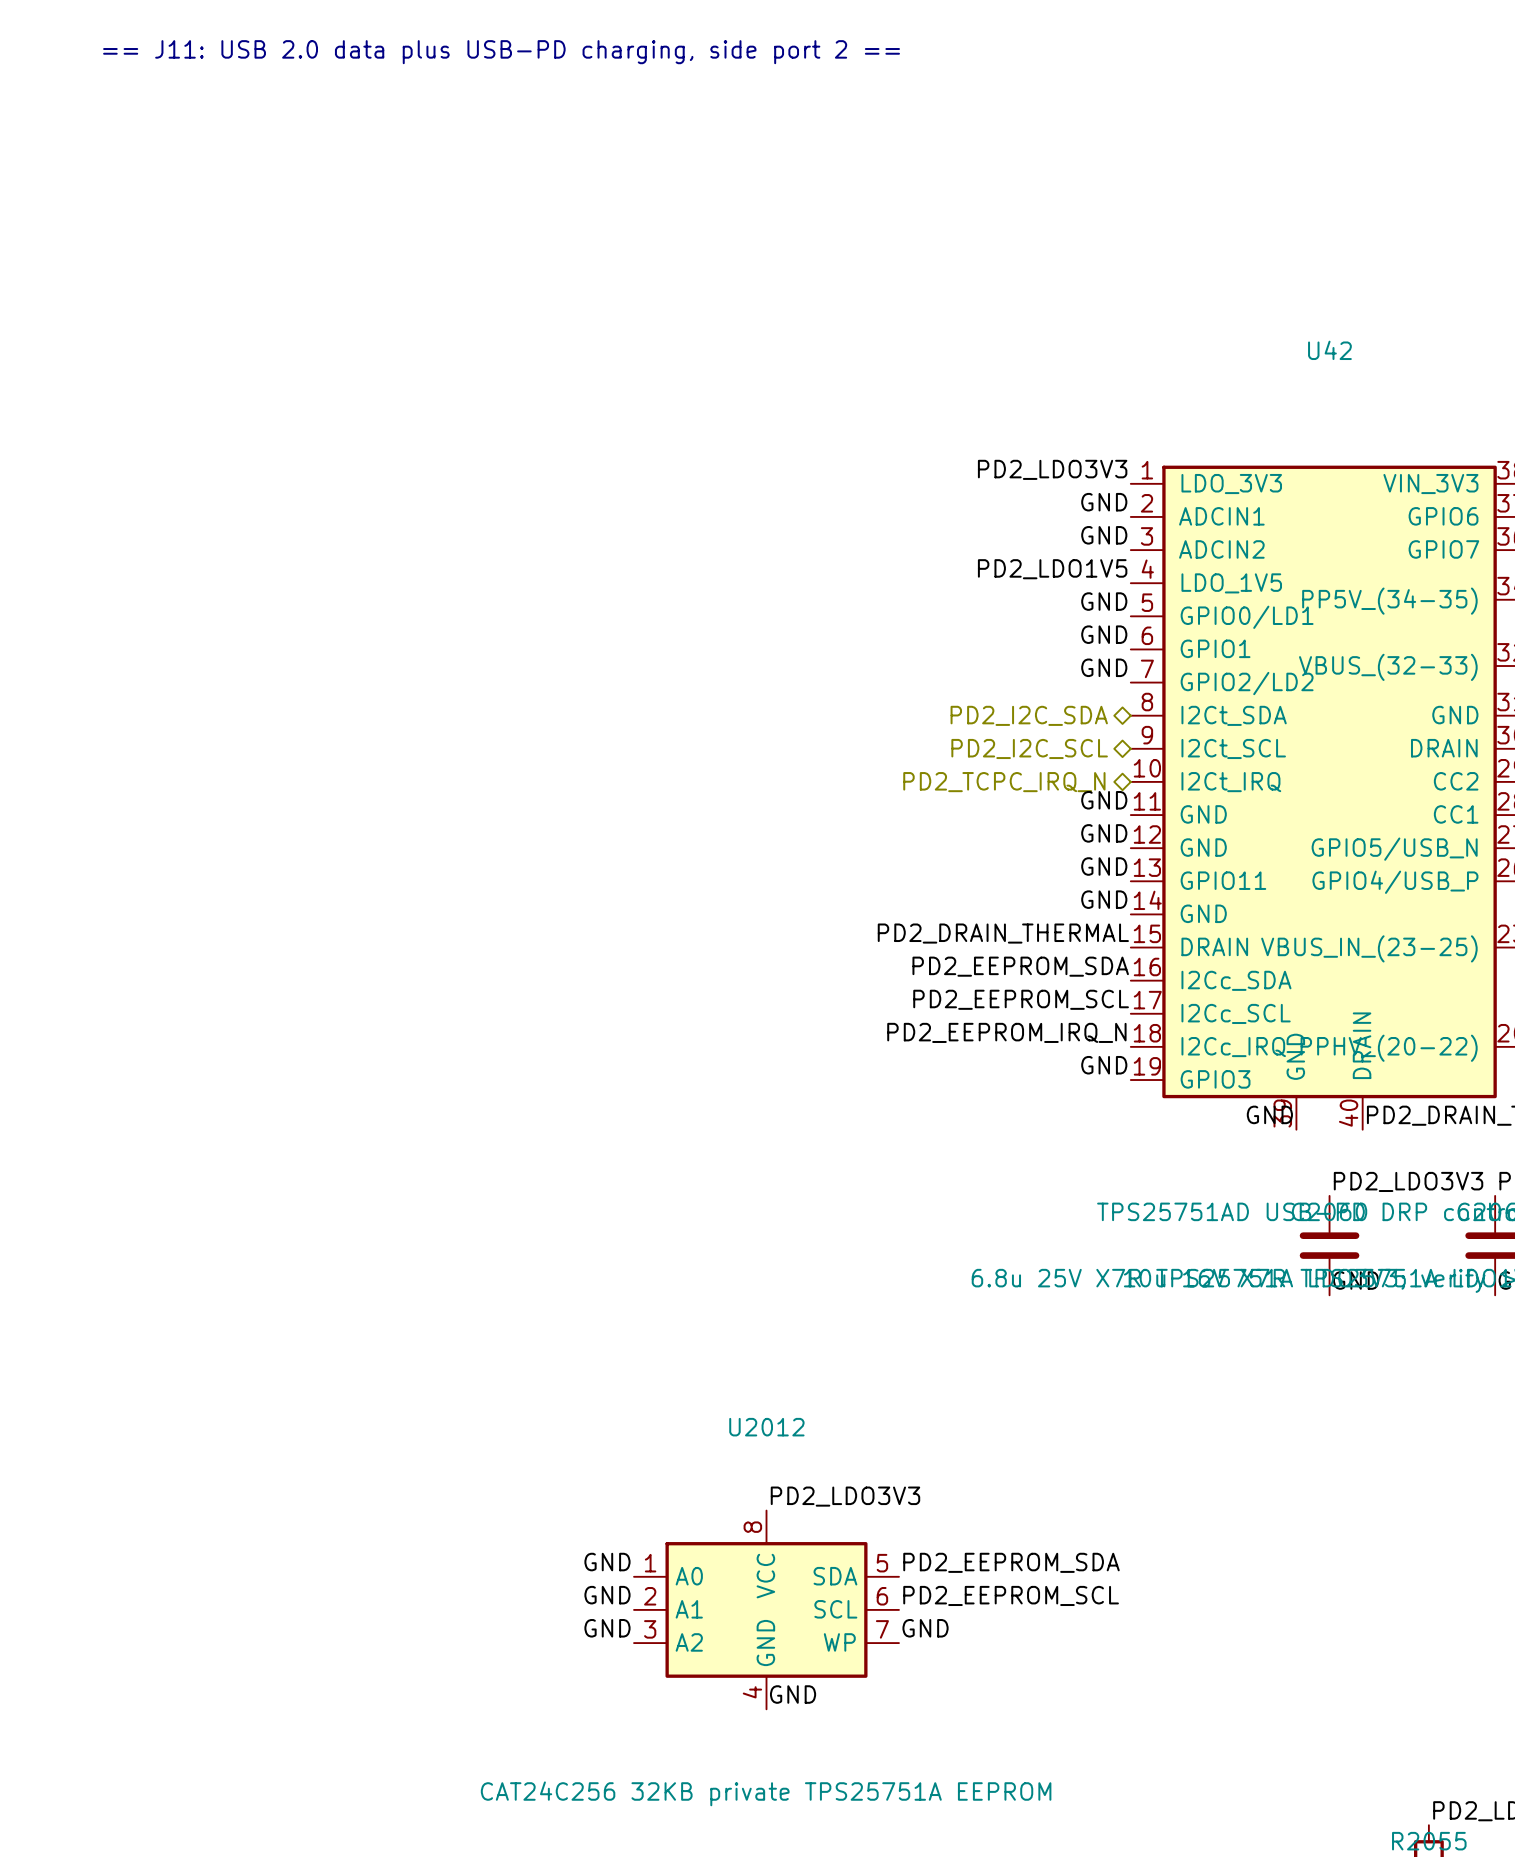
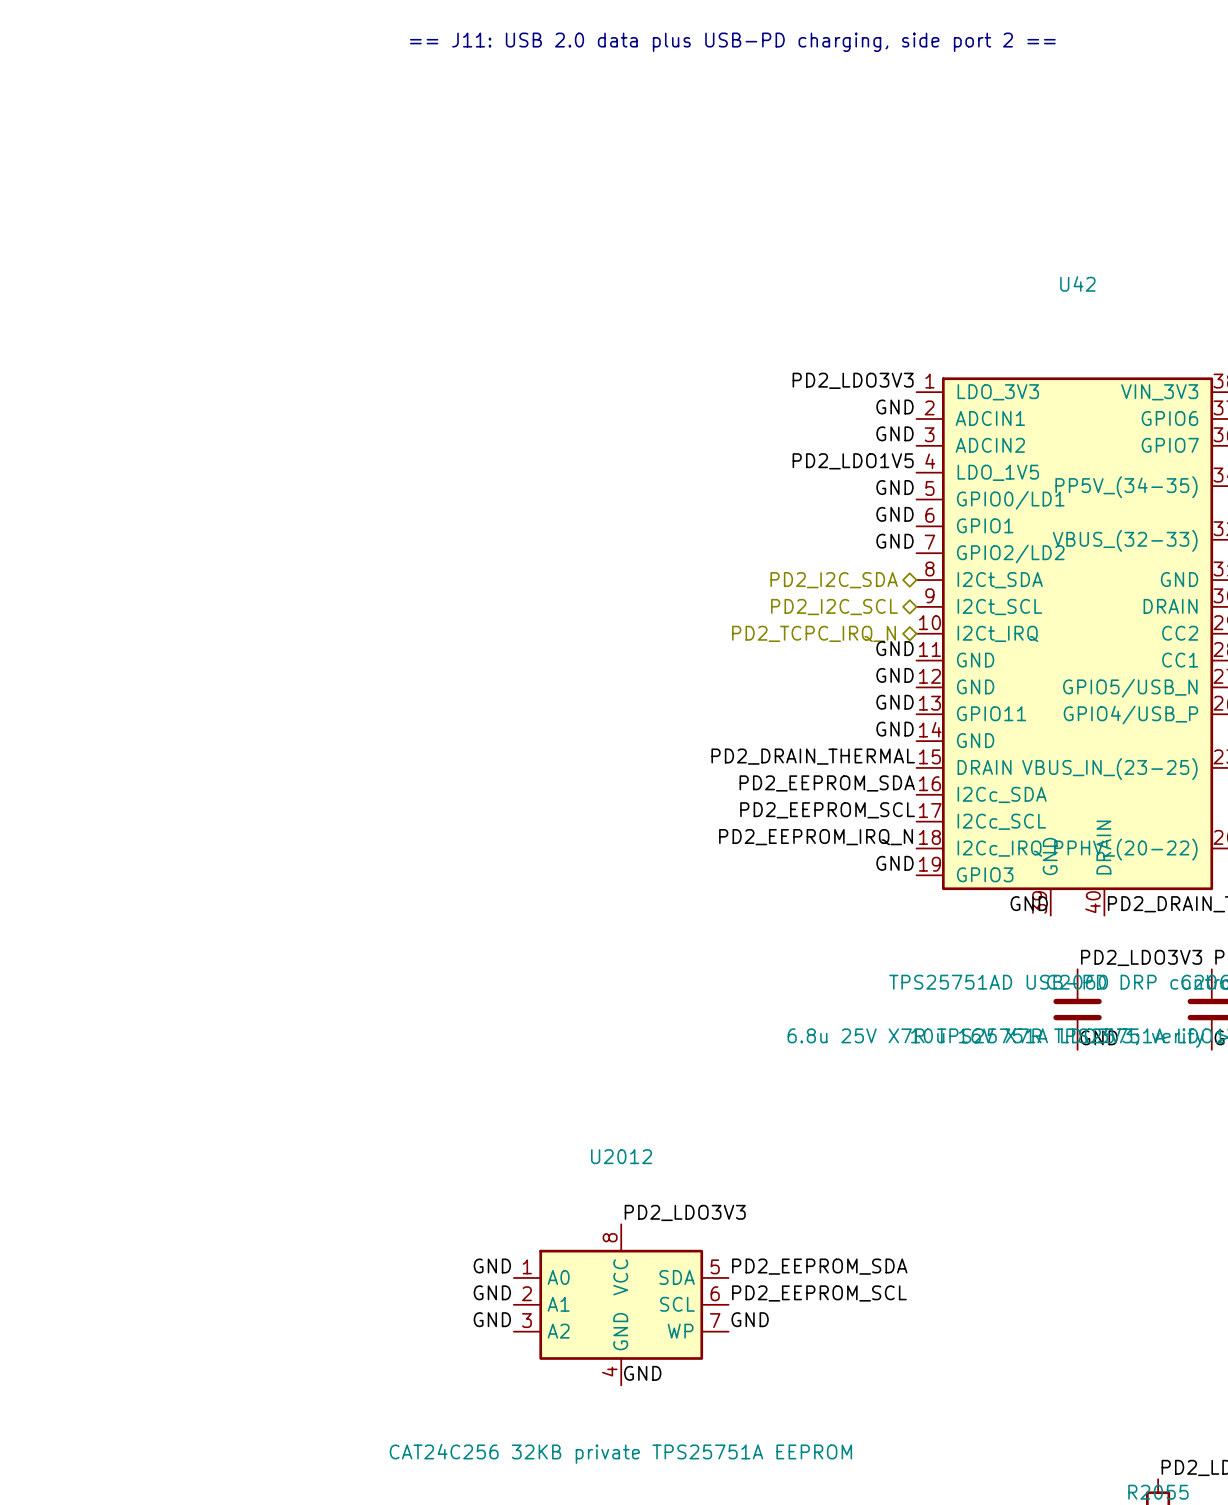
text position: == J11: USB 2.0 data plus USB-PD charging, side port 2 == (501, 52) -> == J11: USB 2.0 data plus USB-PD charging, side port 2 == (732, 42)

